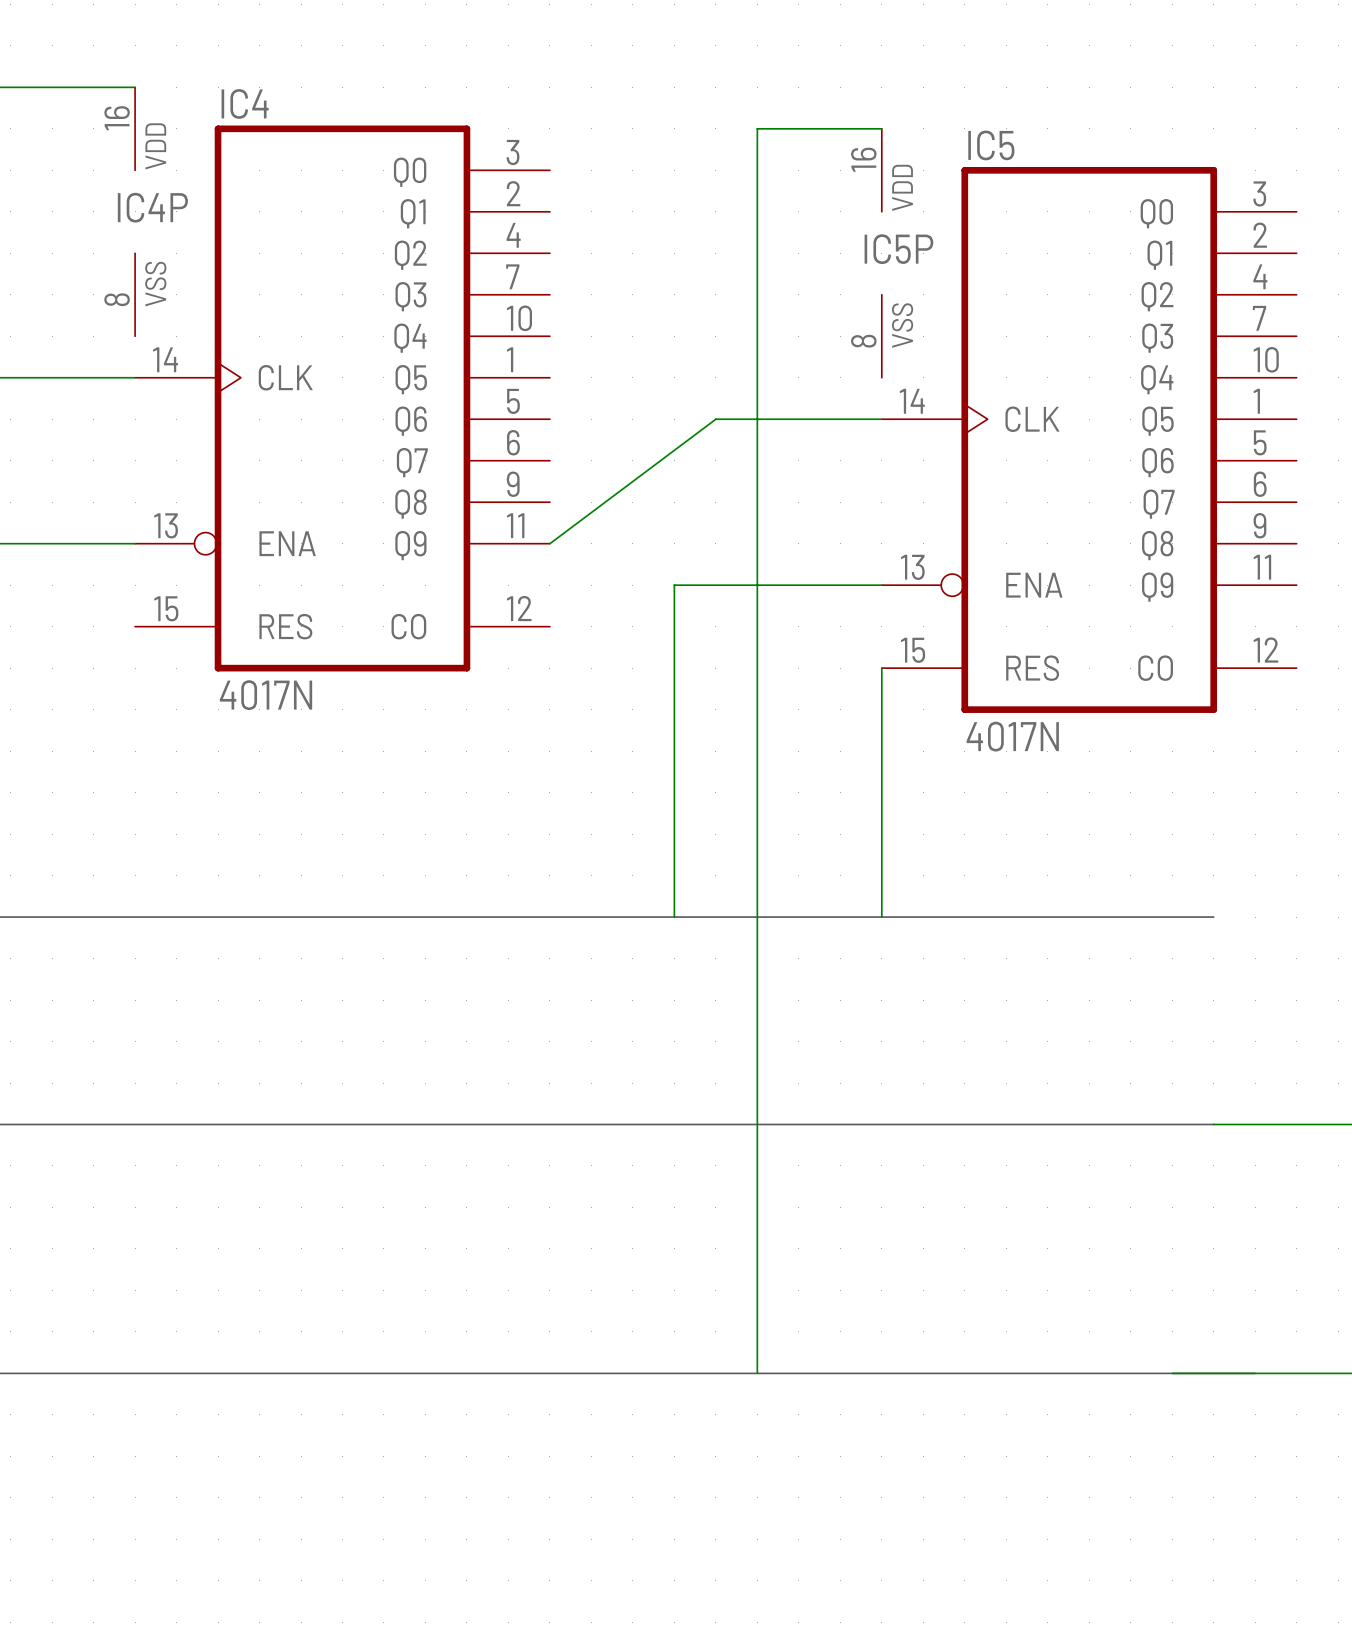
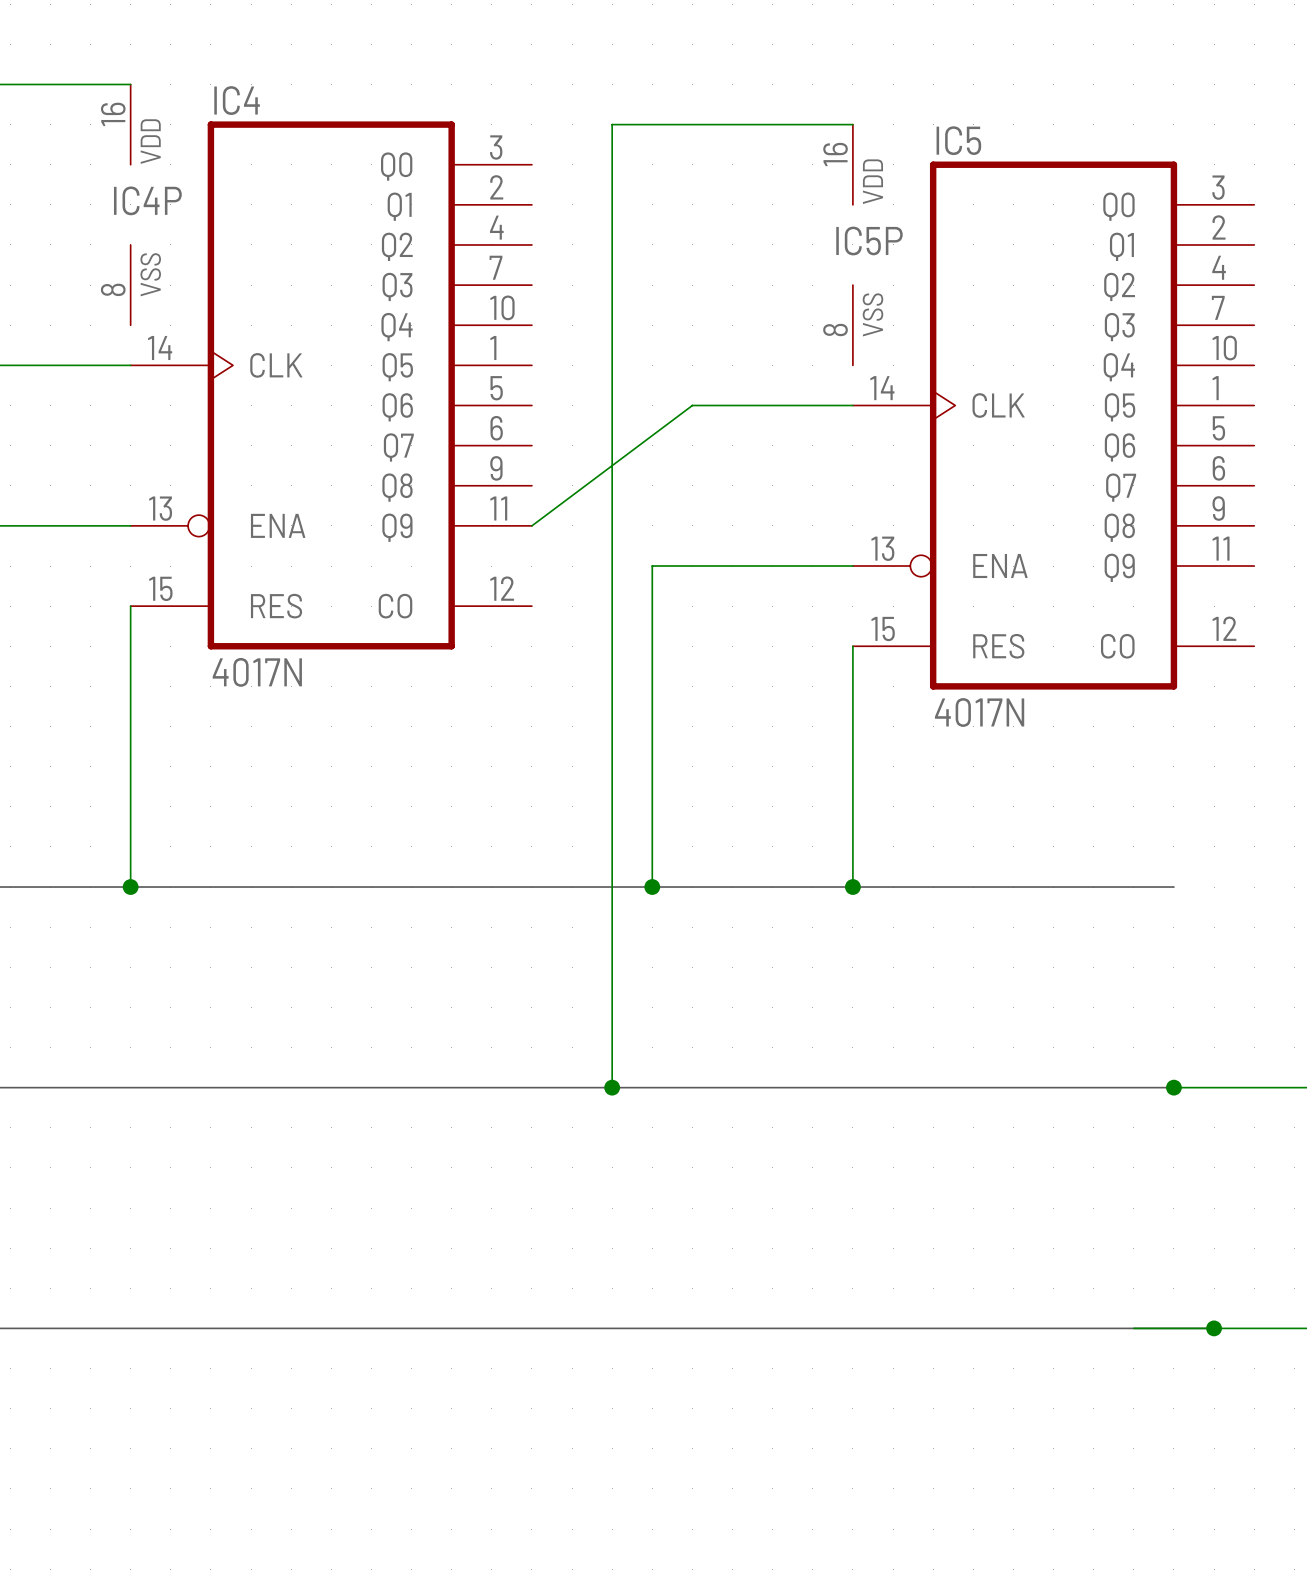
wire: (757, 128) (757, 1373) -> (732, 124) (612, 124) (612, 1087)
wire: none -> (130, 606) (130, 887)
junction: none -> (130, 887)
junction: none -> (652, 887)
junction: none -> (852, 887)
junction: none -> (612, 1087)
junction: none -> (1173, 1087)
junction: none -> (1214, 1328)

